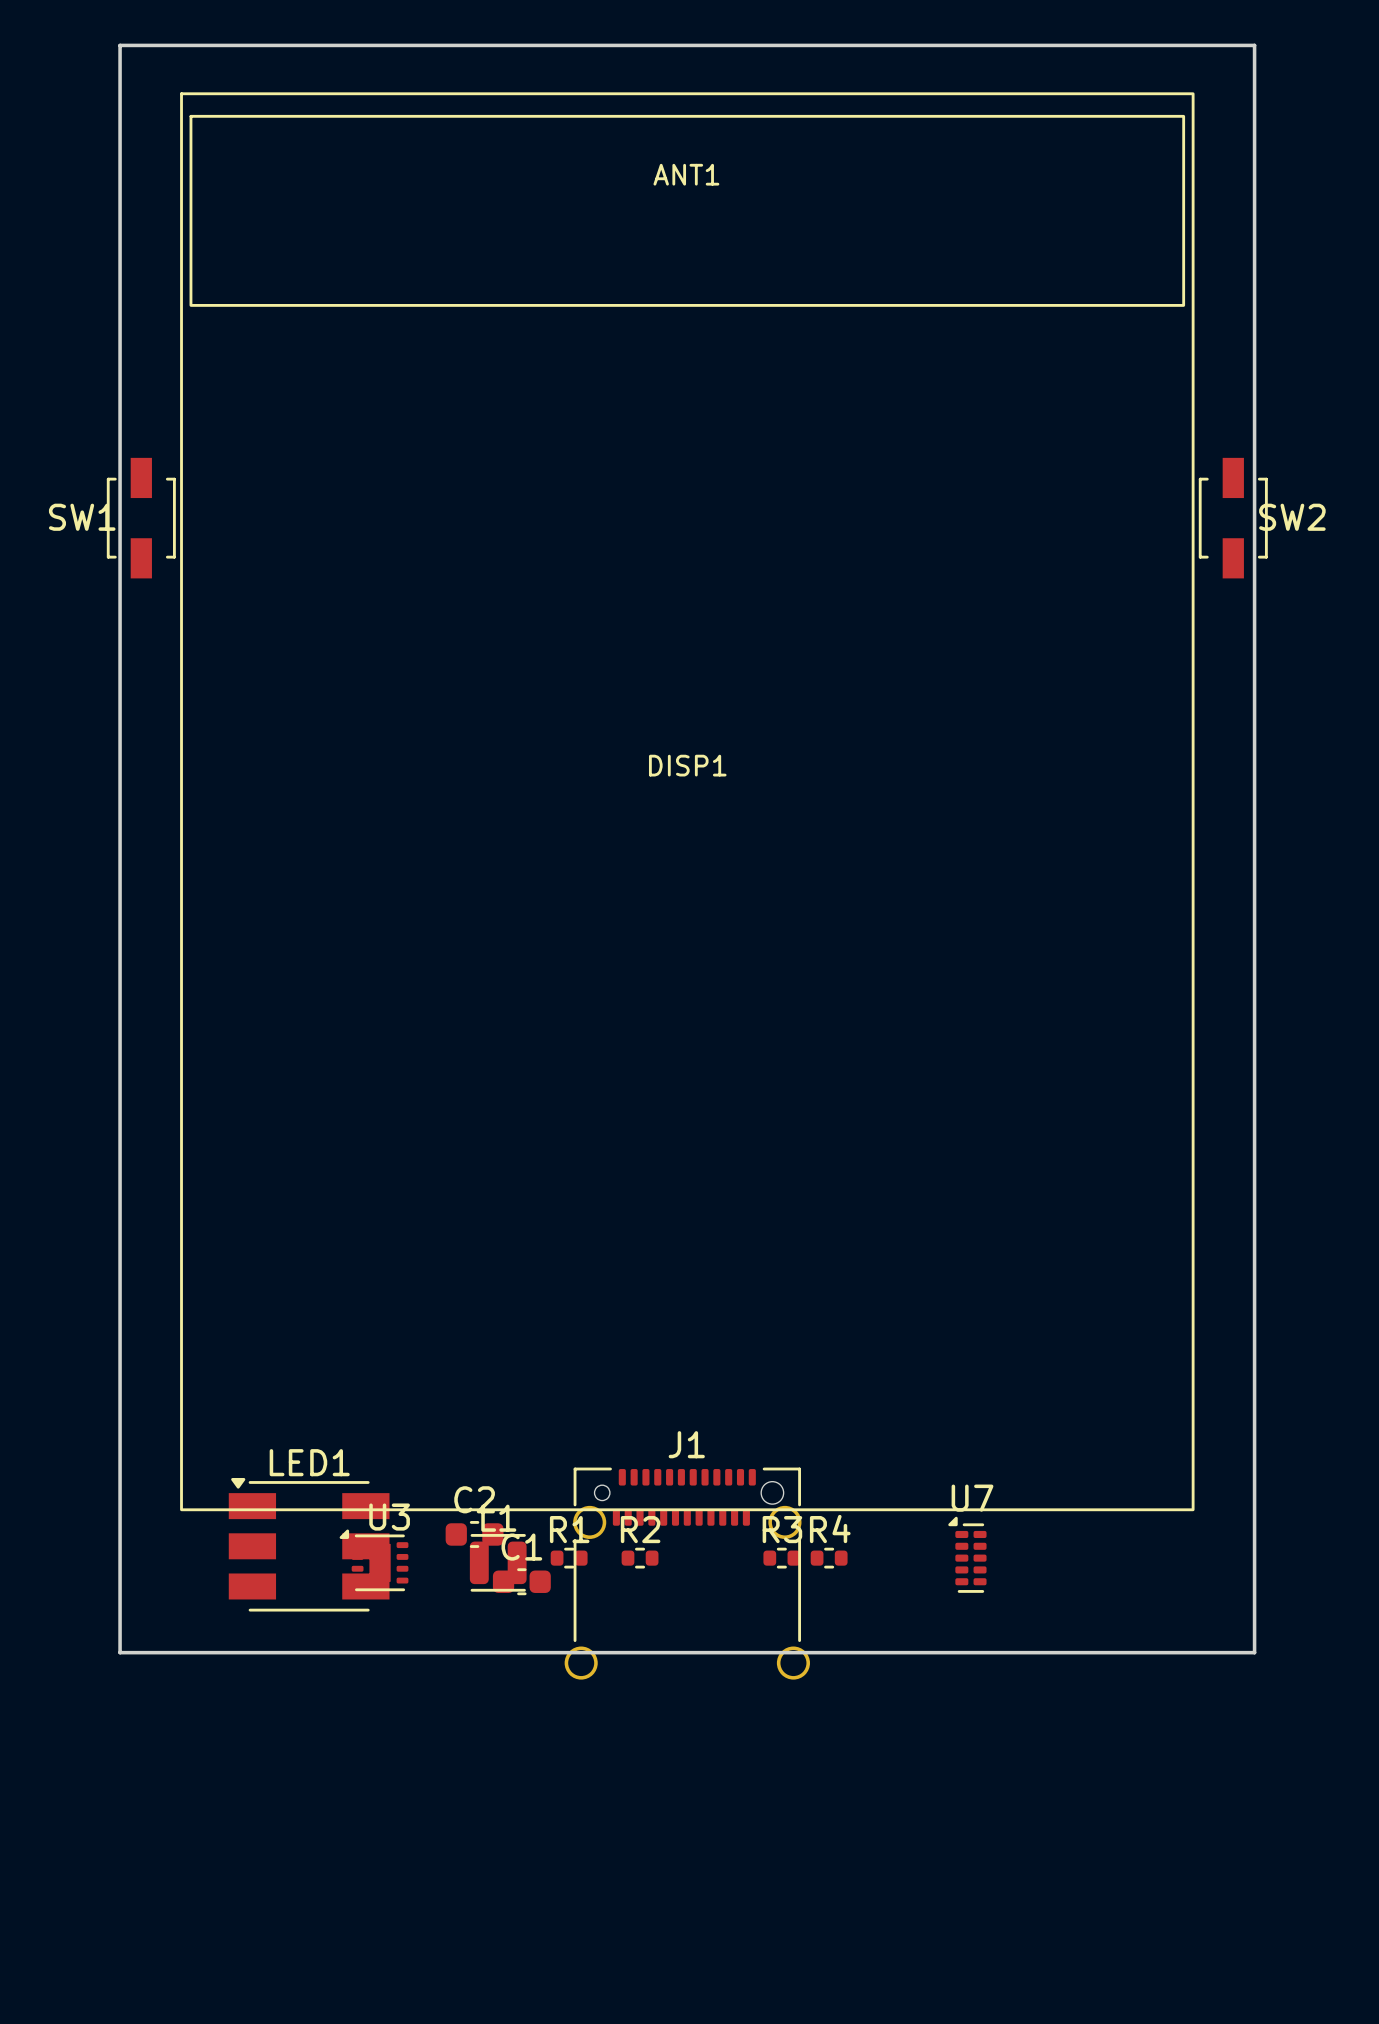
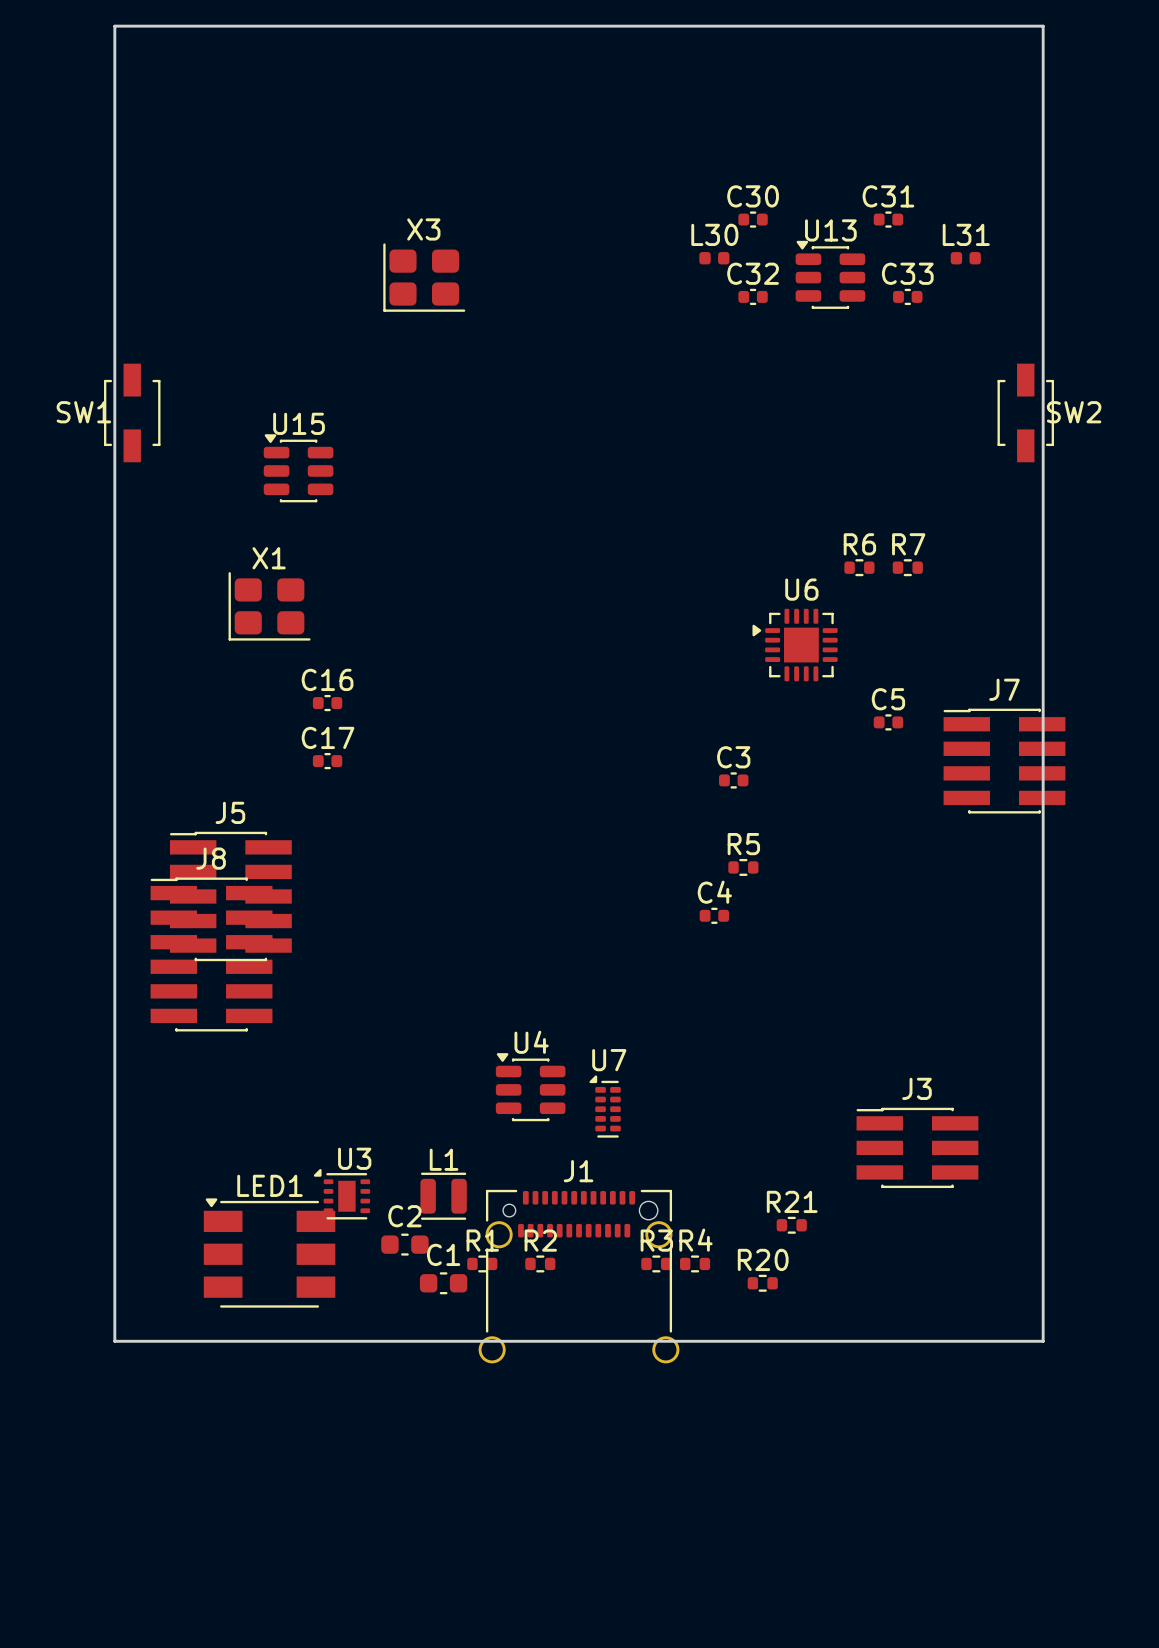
ANT1: (687, 210) -> none
C30: none -> (753, 219)
C31: none -> (888, 219)
L30: none -> (714, 258)
L31: none -> (965, 258)
U13: none -> (830, 274)
X3: none -> (424, 277)
C32: none -> (753, 296)
C33: none -> (907, 296)
U15: none -> (298, 468)
R6: none -> (859, 567)
R7: none -> (907, 567)
X1: none -> (269, 606)
DISP1: (687, 801) -> none
U6: none -> (795, 645)
C16: none -> (327, 703)
C5: none -> (888, 722)
C17: none -> (327, 761)
J7: none -> (1004, 761)
C3: none -> (733, 780)
R5: none -> (743, 867)
J5: none -> (230, 896)
C4: none -> (714, 915)
J8: none -> (211, 954)
U4: none -> (530, 1087)
J3: none -> (917, 1147)
R21: none -> (791, 1225)
U7 position: (967, 1554) -> (605, 1106)
U3 position: (374, 1560) -> (341, 1194)
L1 position: (498, 1562) -> (443, 1196)
R20: none -> (762, 1283)

